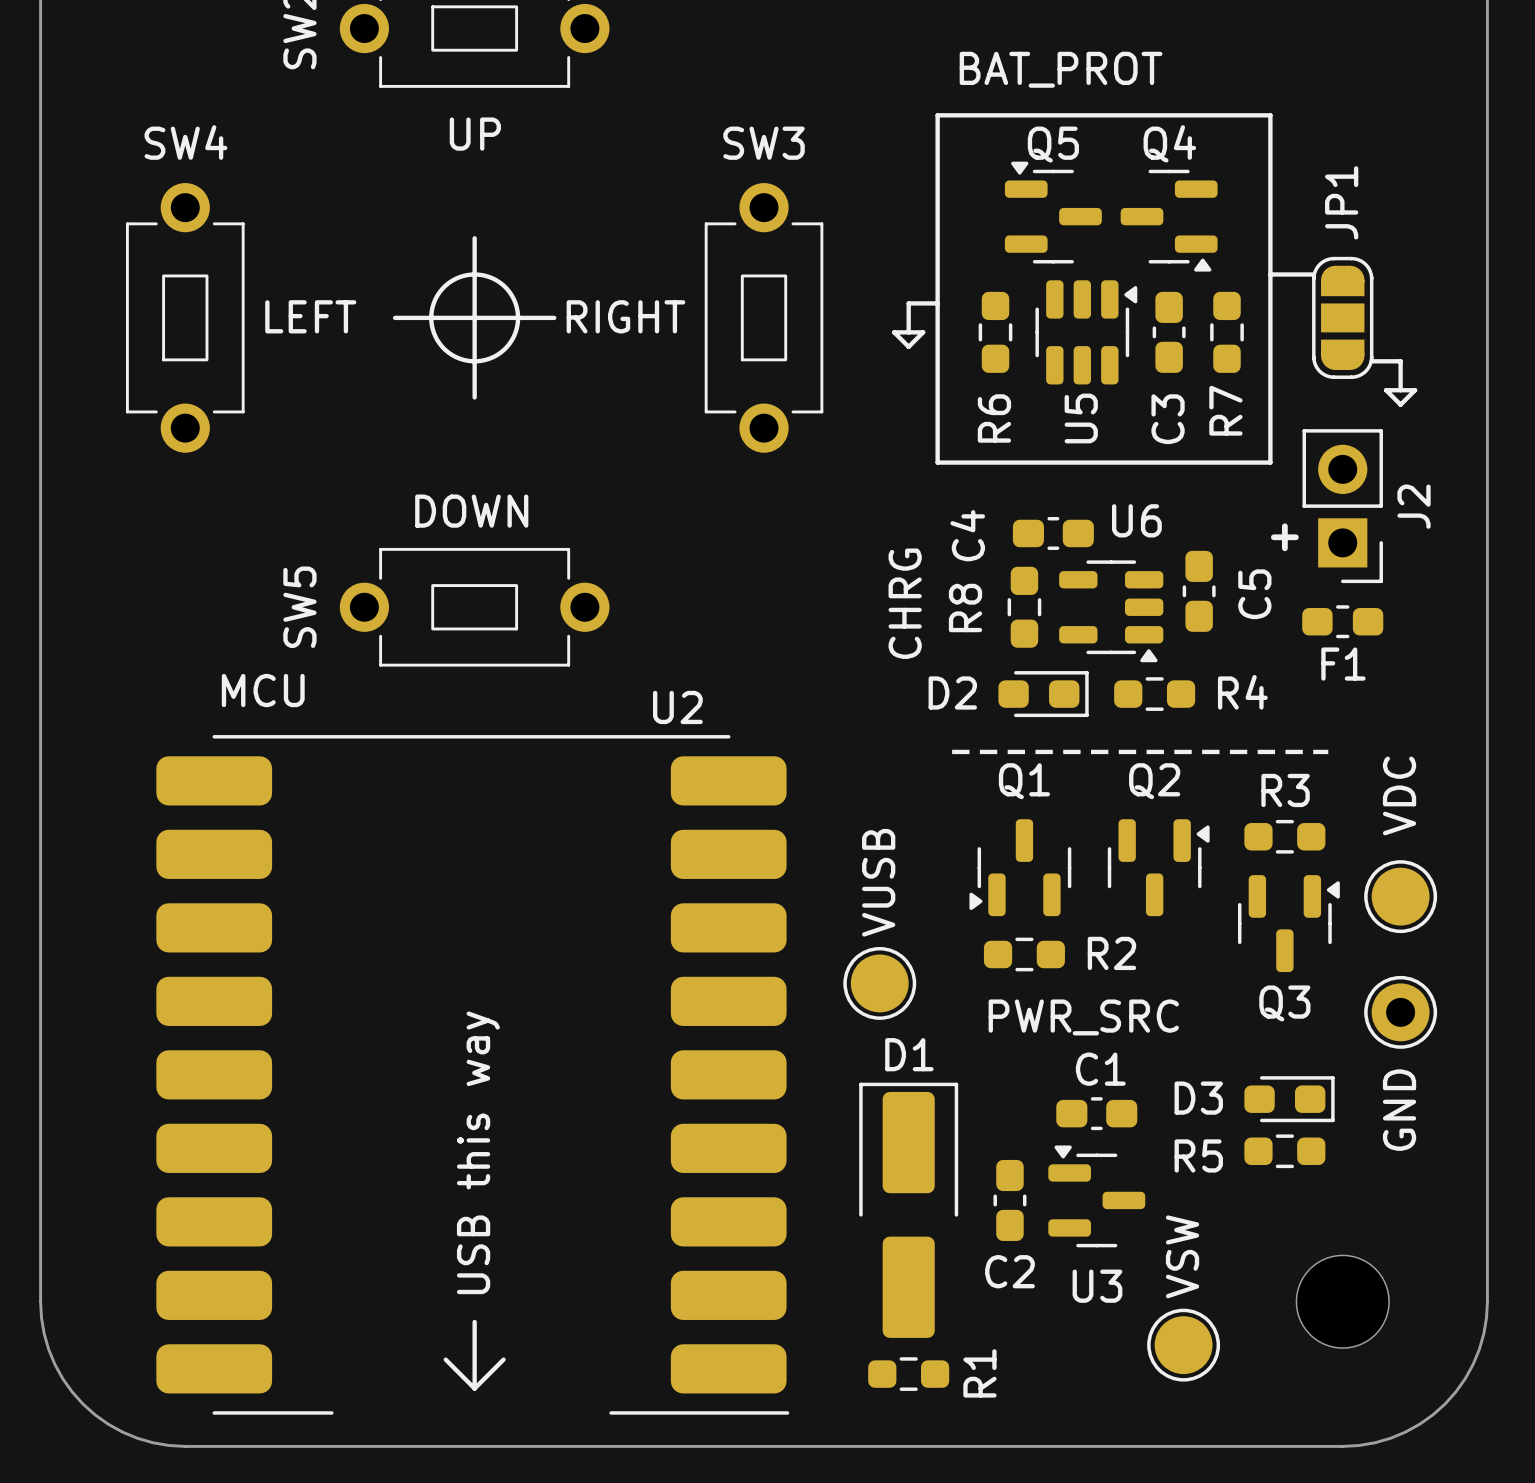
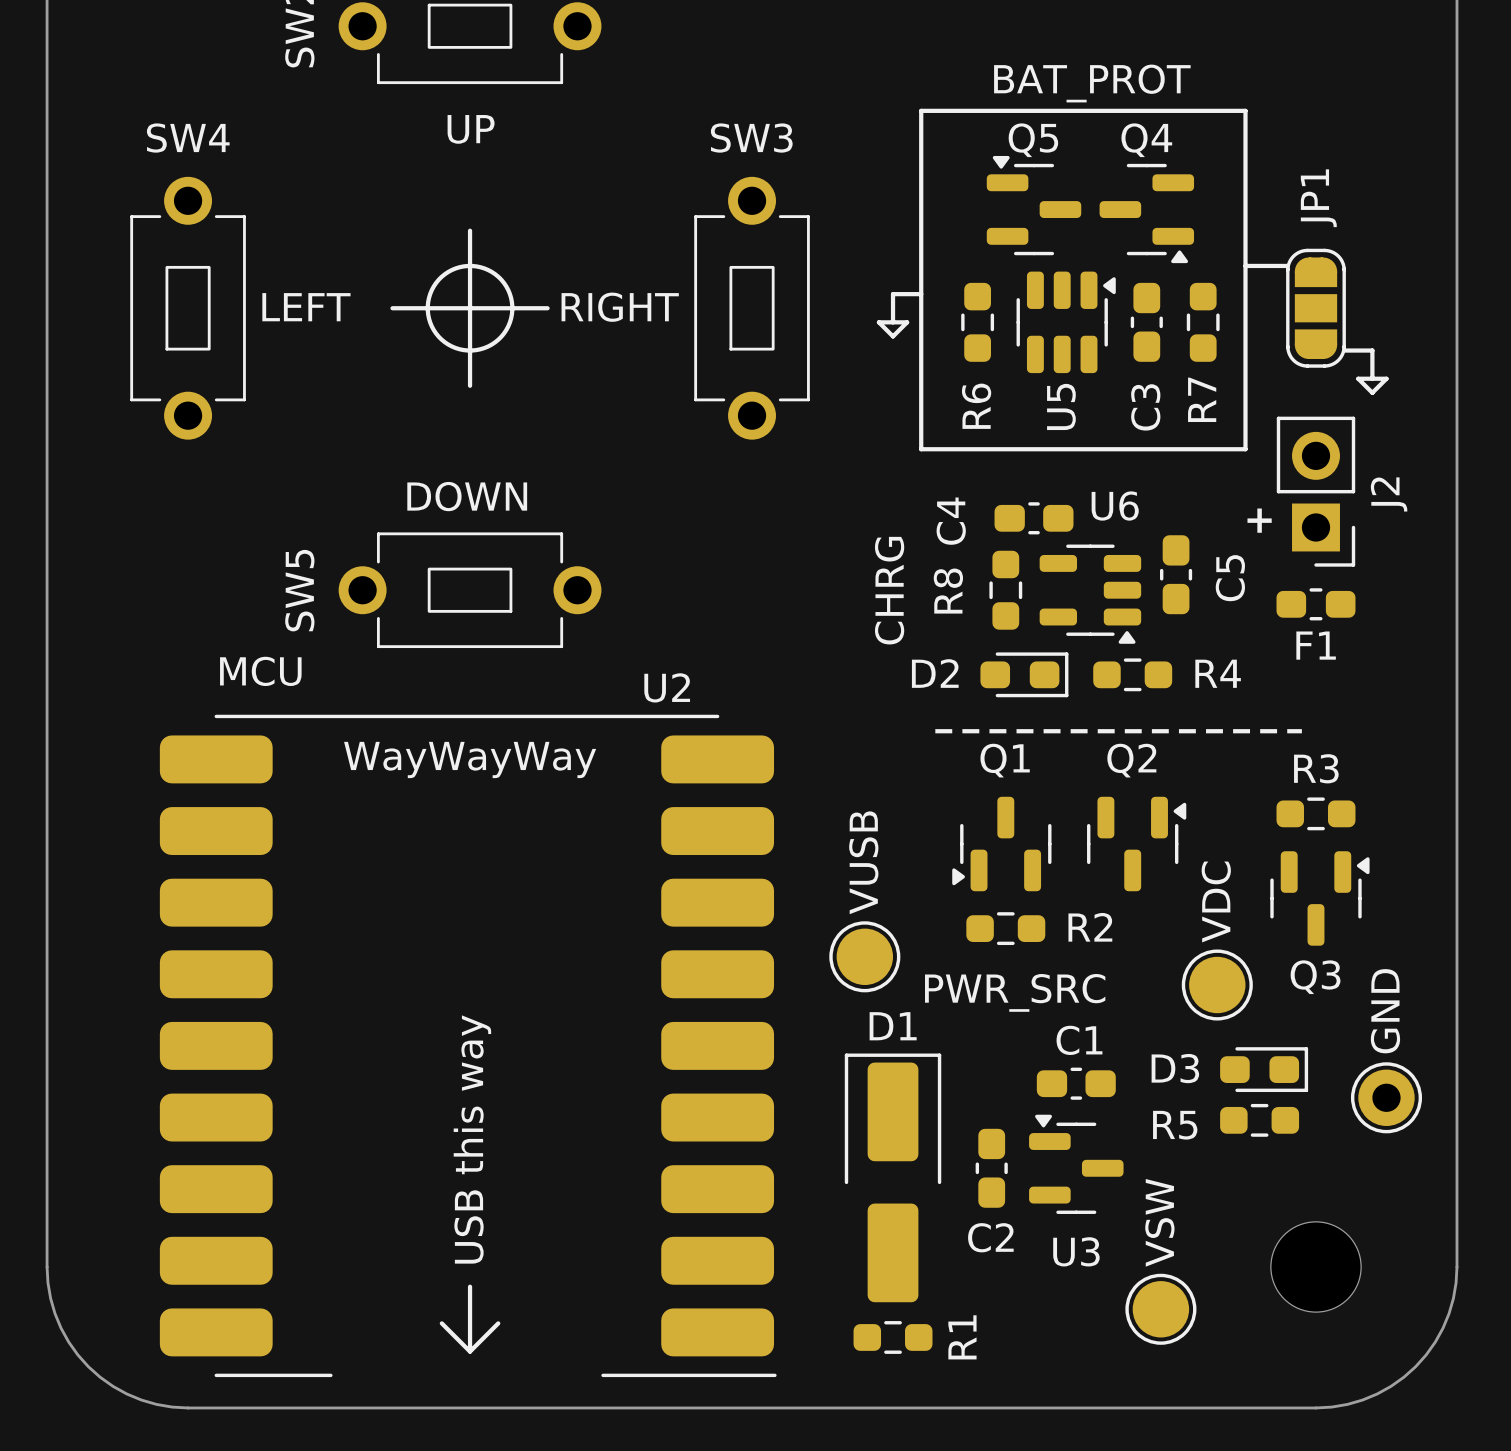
text position: BAT_PROT (1061, 69) -> BAT_PROT (1092, 83)
text: none -> WayWayWay (470, 759)
text position: VDC (1399, 795) -> VDC (1216, 901)
R3 position: (1284, 836) -> (1315, 813)
part position: (1400, 896) -> (1217, 985)
Q3 position: (1288, 923) -> (1319, 898)
part position: (1400, 1012) -> (1386, 1097)
text position: PWR_SRC (1083, 1017) -> PWR_SRC (1015, 992)
text position: GND (1399, 1110) -> GND (1385, 1011)

